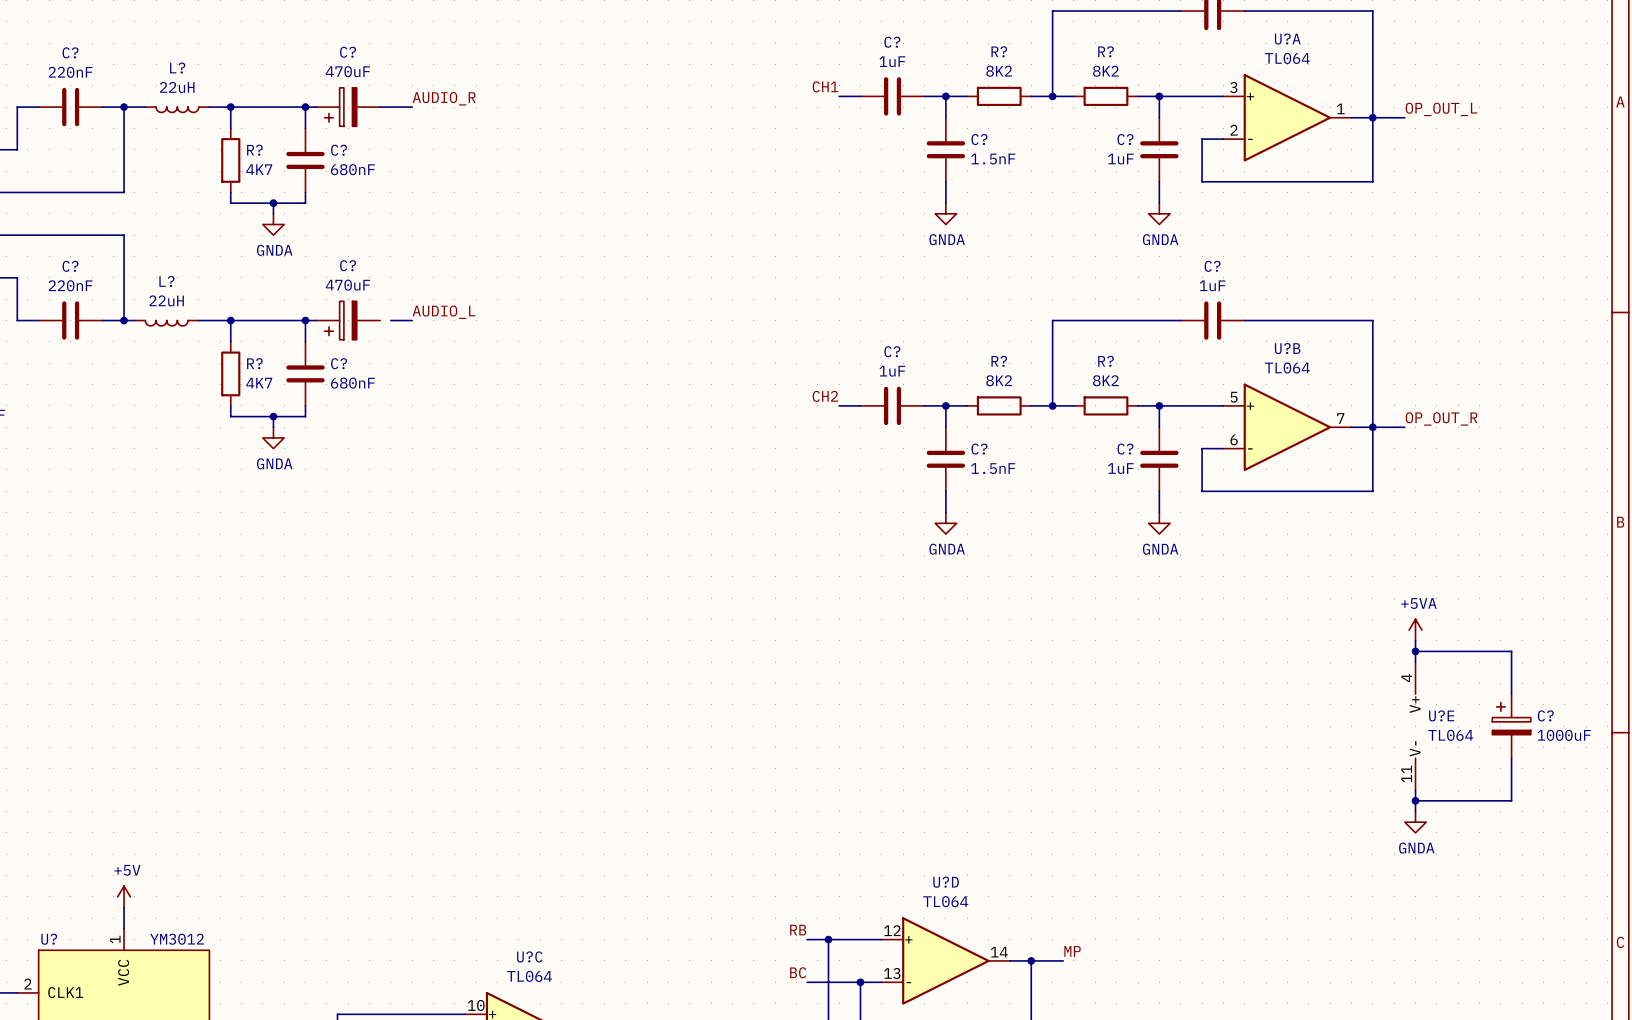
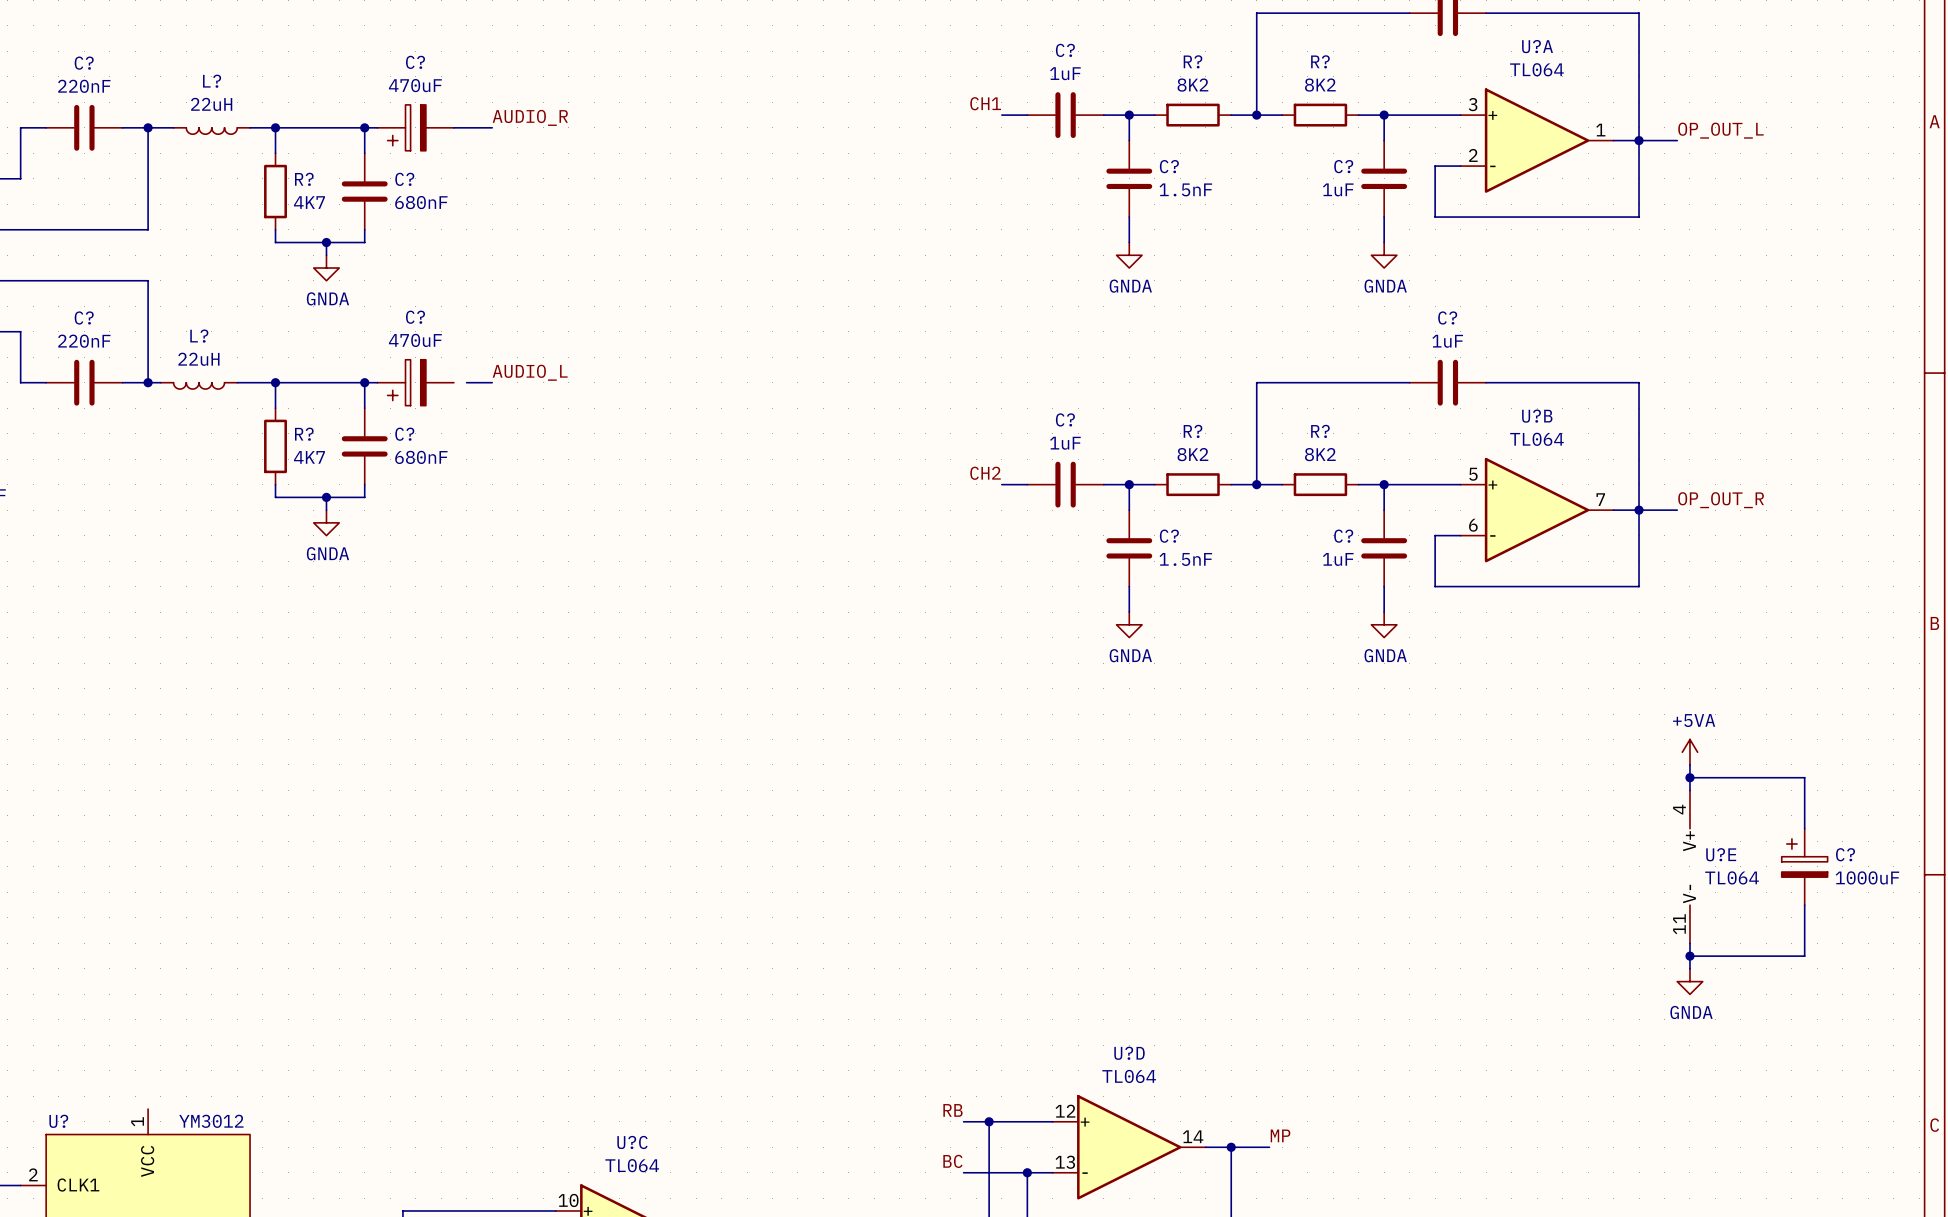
power symbol: +5V (124, 896) -> none
wire: (124, 907) (124, 928) -> none

